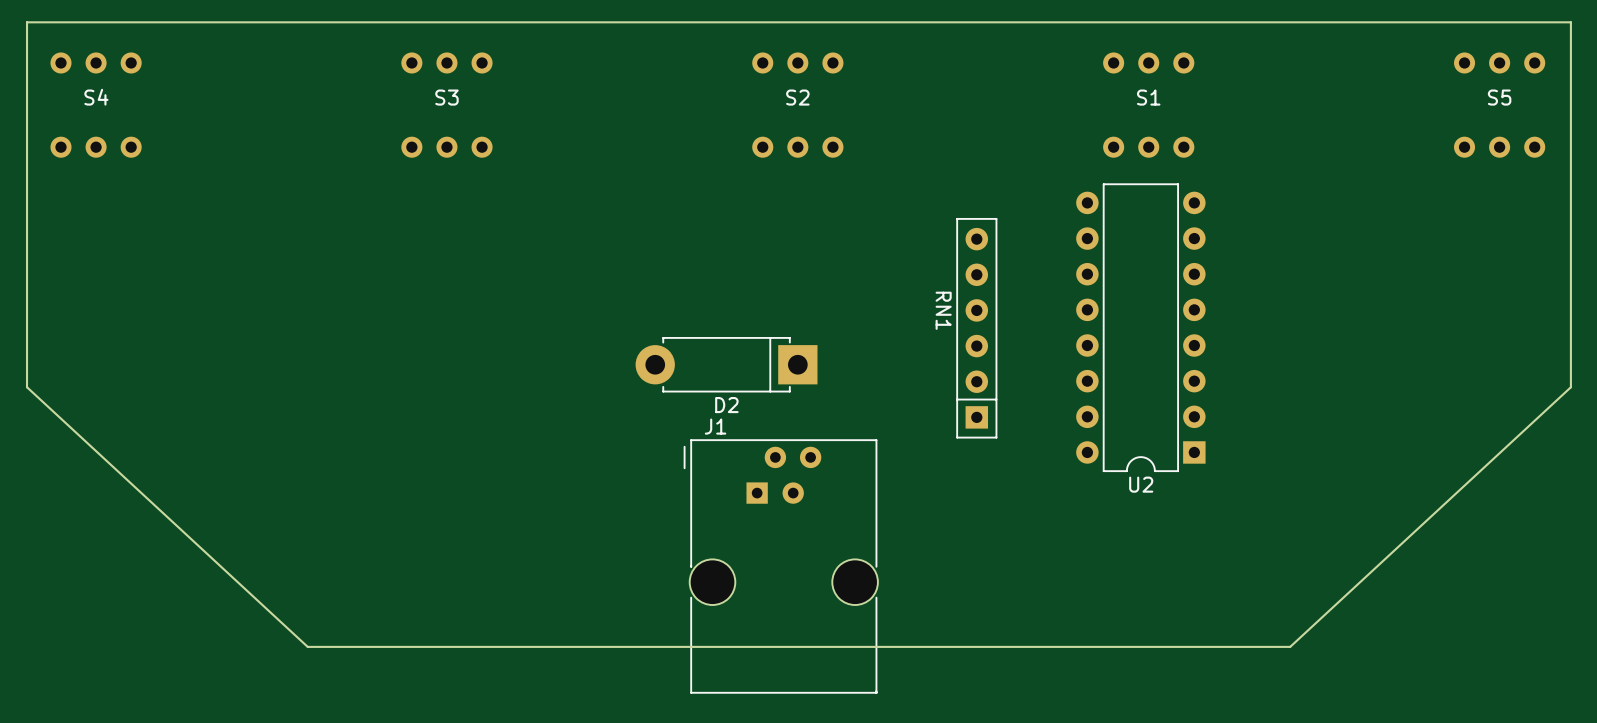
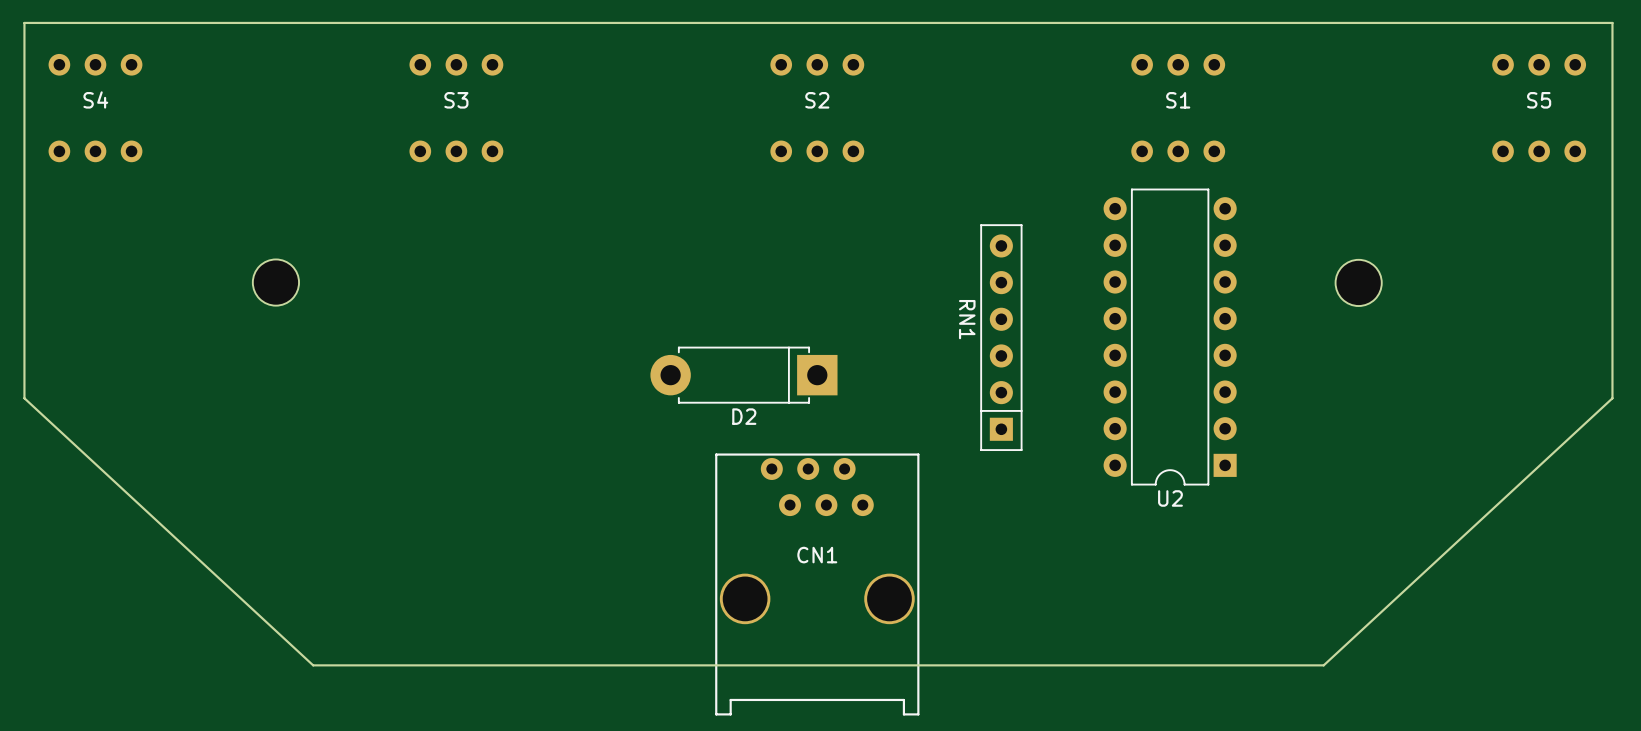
part: none -> (275, 282)
part: none -> (1358, 282)
J1: (780, 566) -> none
CN1: none -> (817, 584)

